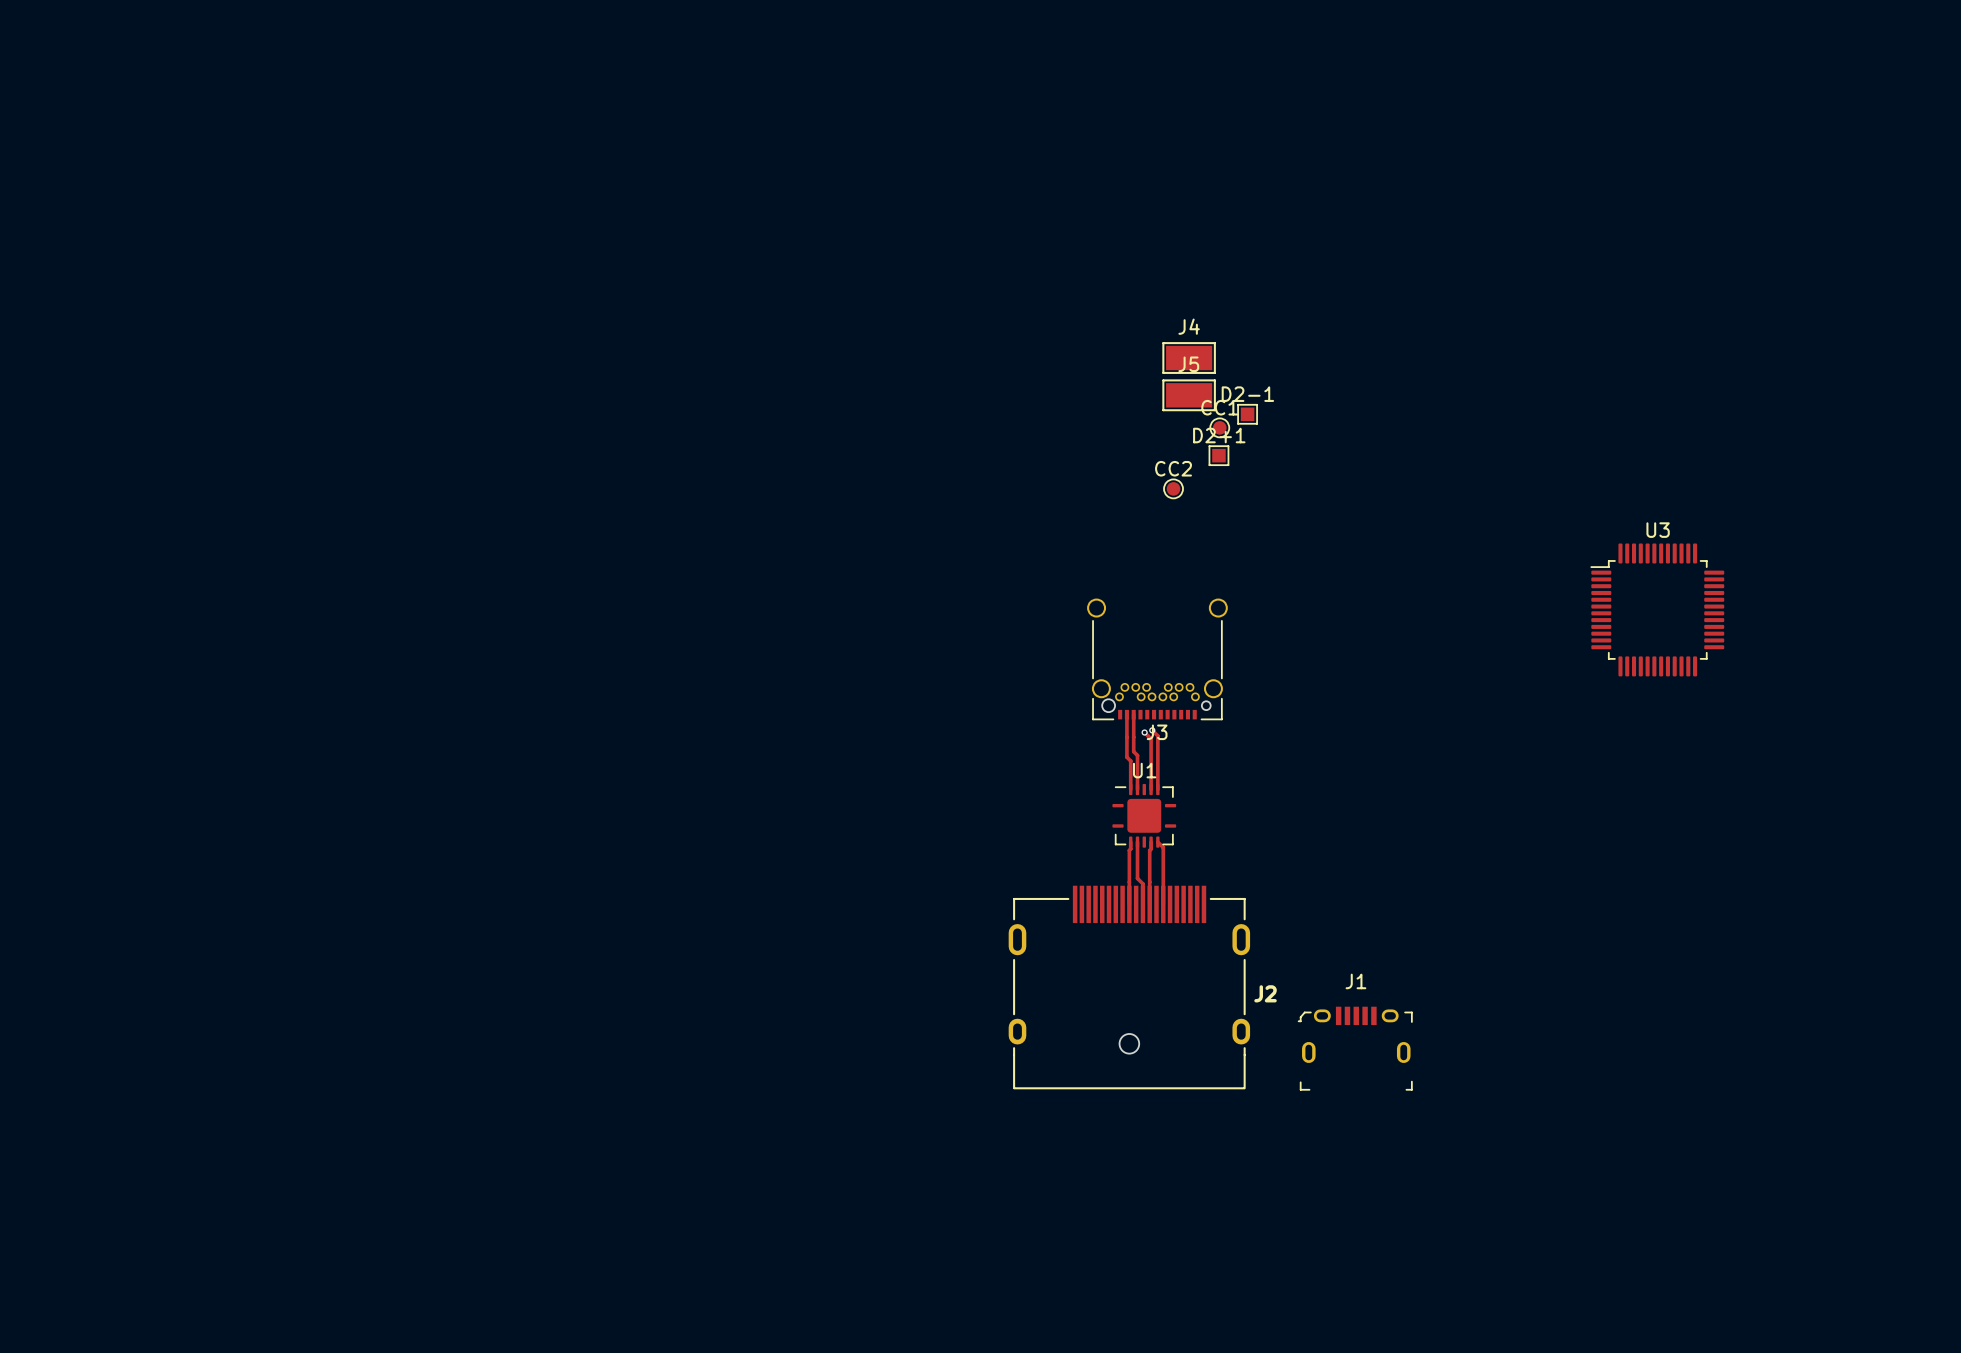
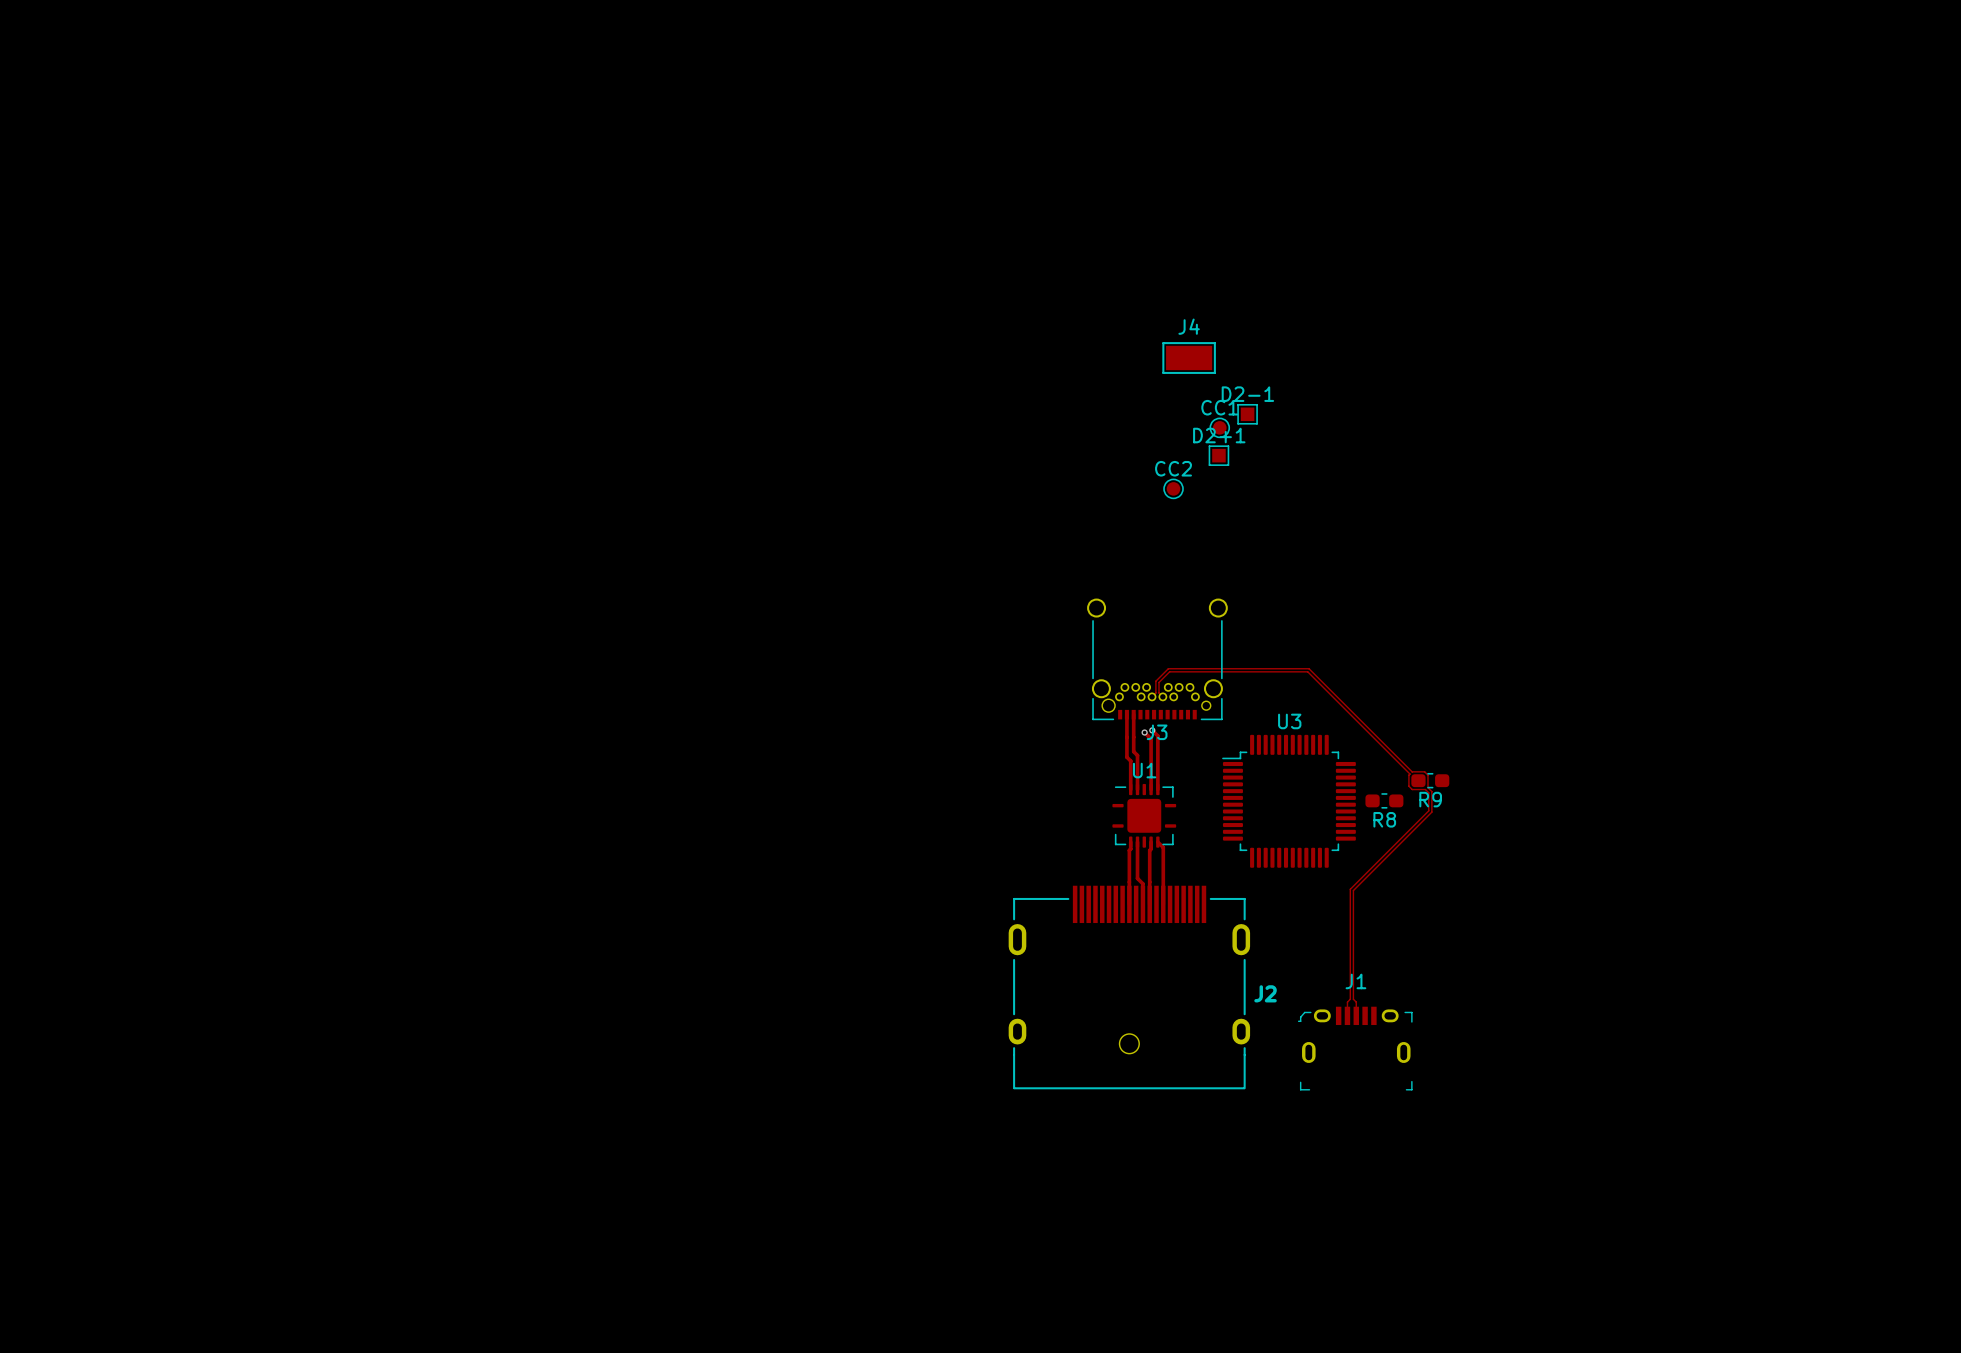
J5: (1189, 395) -> none
U3 position: (1657, 609) -> (1289, 801)
track: none -> (1152, 696) (1155, 693) (1155, 681) (1168, 668) (1309, 668) (1412, 771)
track: none -> (1162, 696) (1158, 693) (1158, 682) (1169, 671) (1307, 671) (1409, 774) (1408, 786) (1412, 789) (1425, 789) (1428, 792) (1428, 810) (1350, 889) (1350, 999) (1347, 1002) (1347, 1015)
track: none -> (1412, 771) (1424, 771) (1427, 775) (1427, 787) (1431, 791) (1431, 812) (1353, 890) (1353, 999) (1356, 1002) (1356, 1015)
R9: none -> (1430, 780)
R8: none -> (1384, 800)

